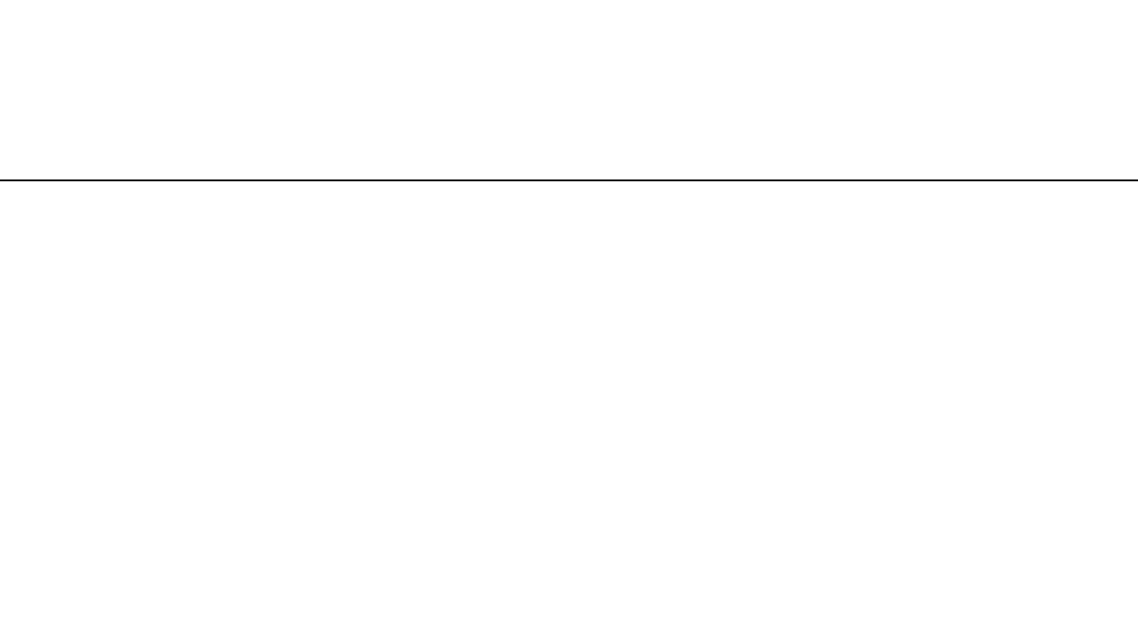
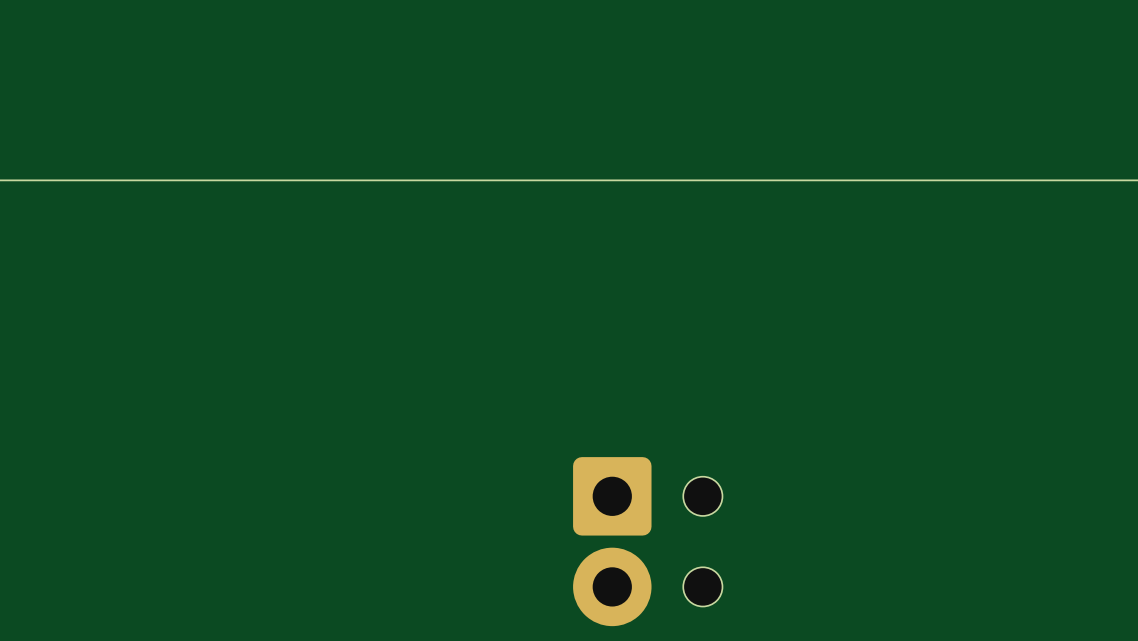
part: none -> (647, 541)

